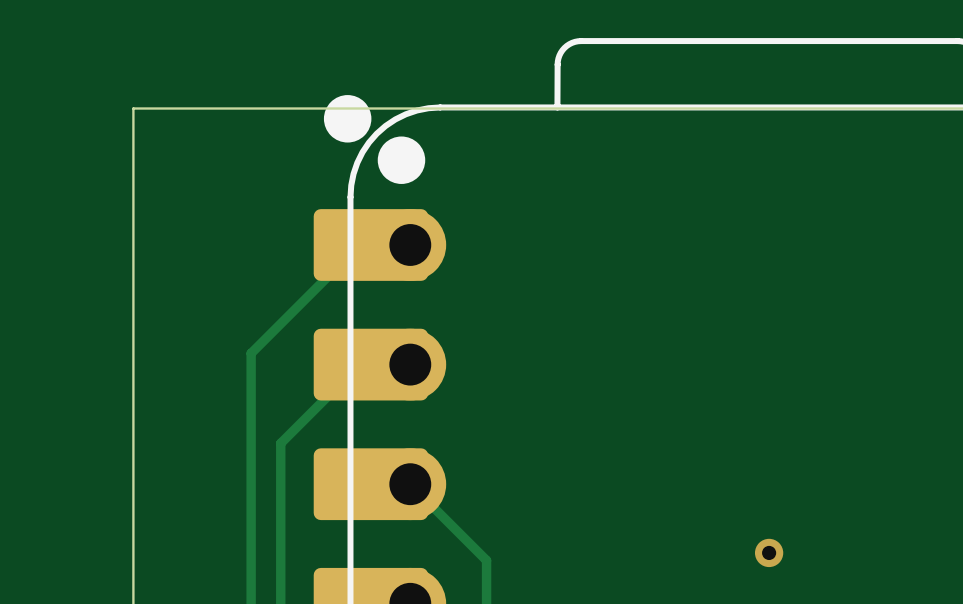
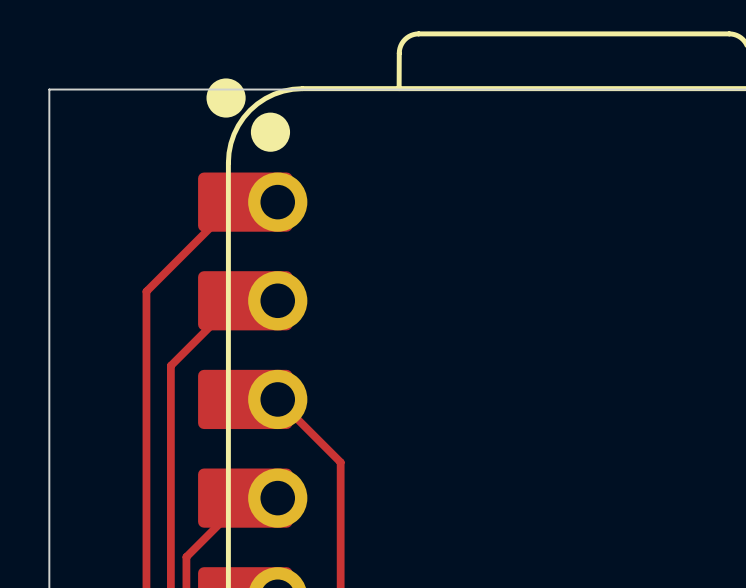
via: (769, 552) -> none

